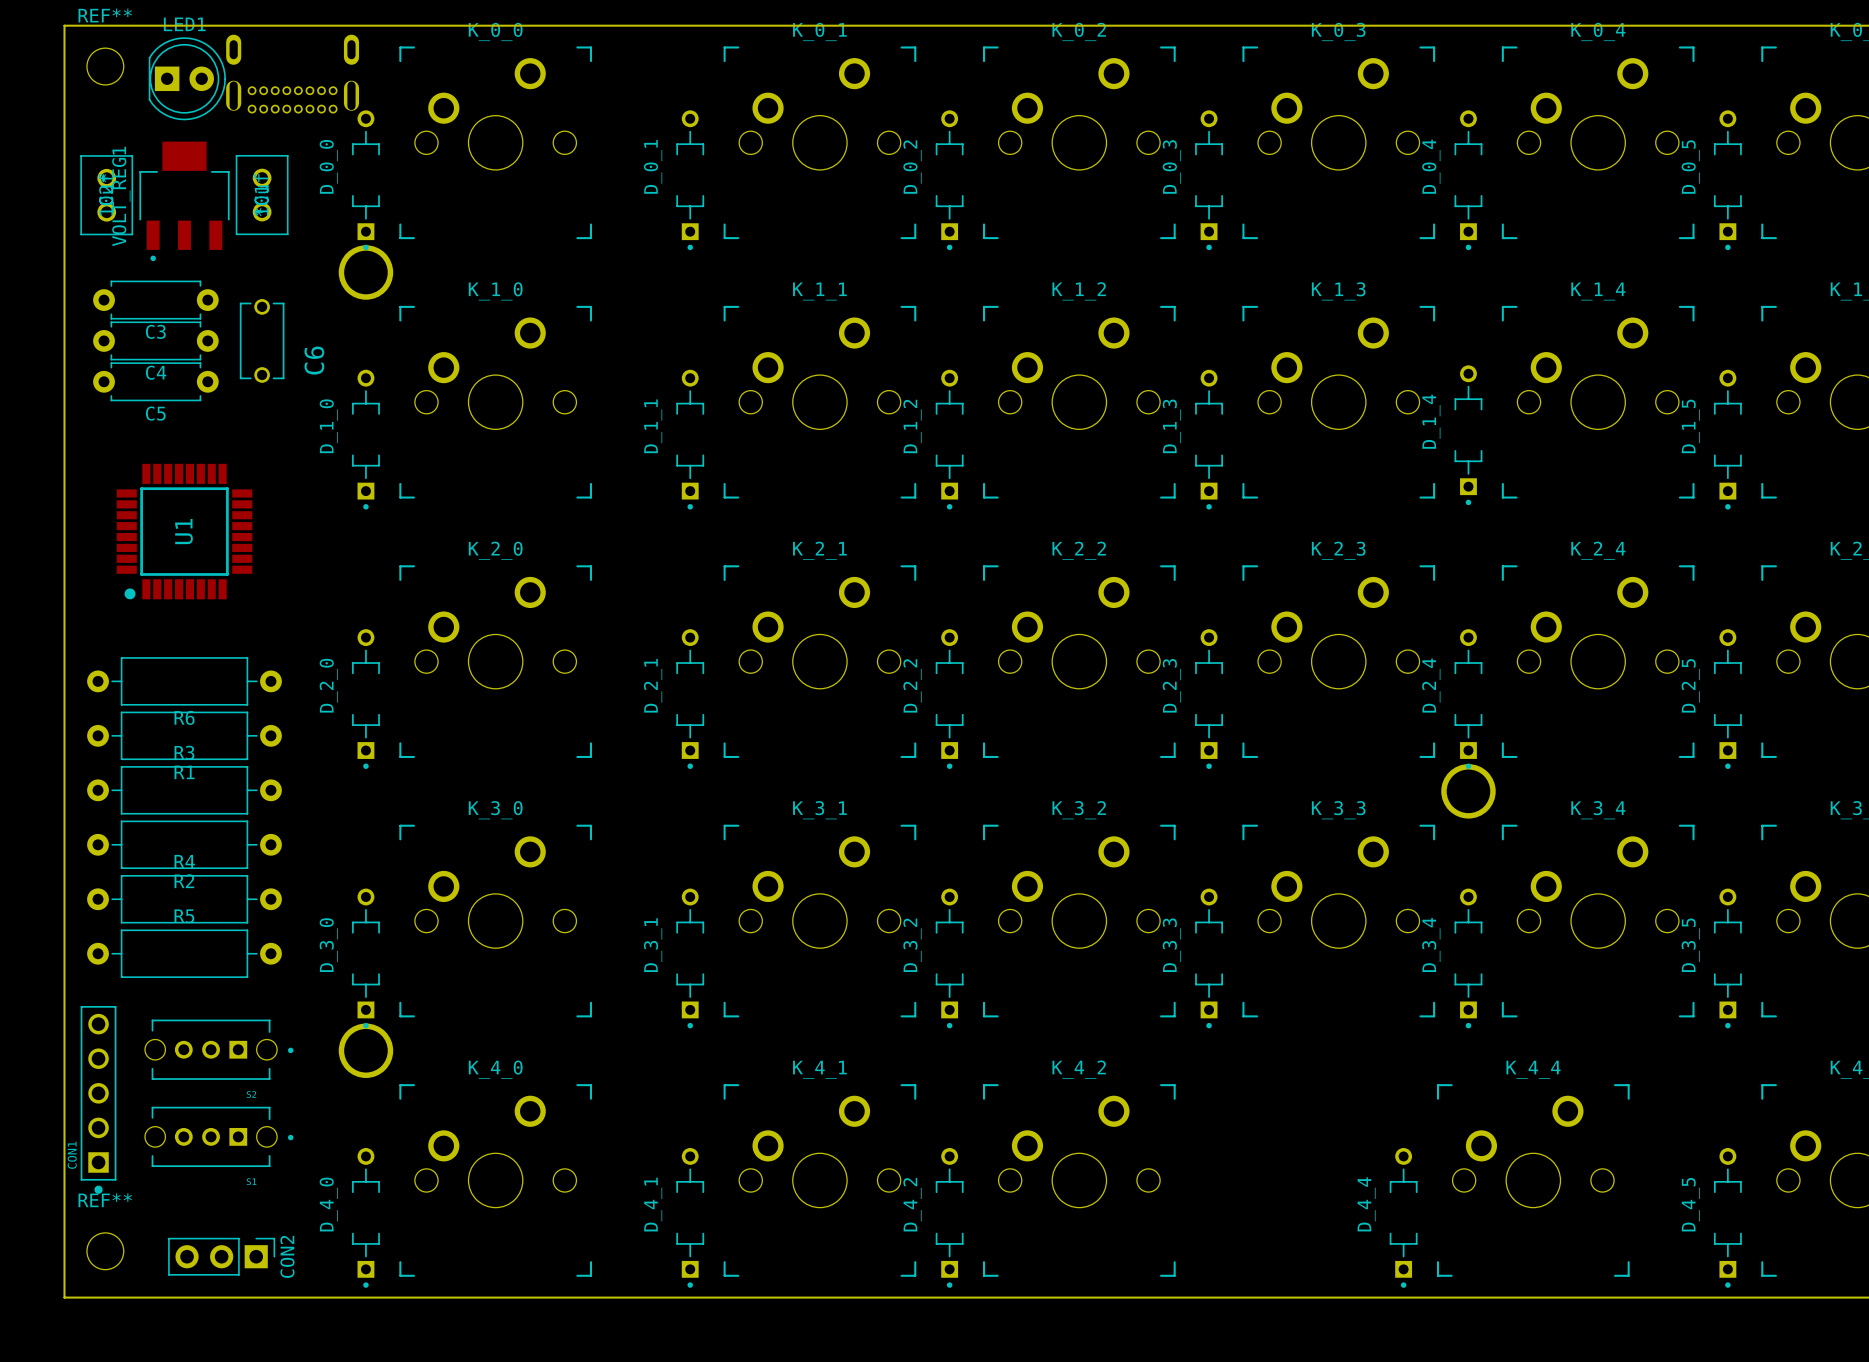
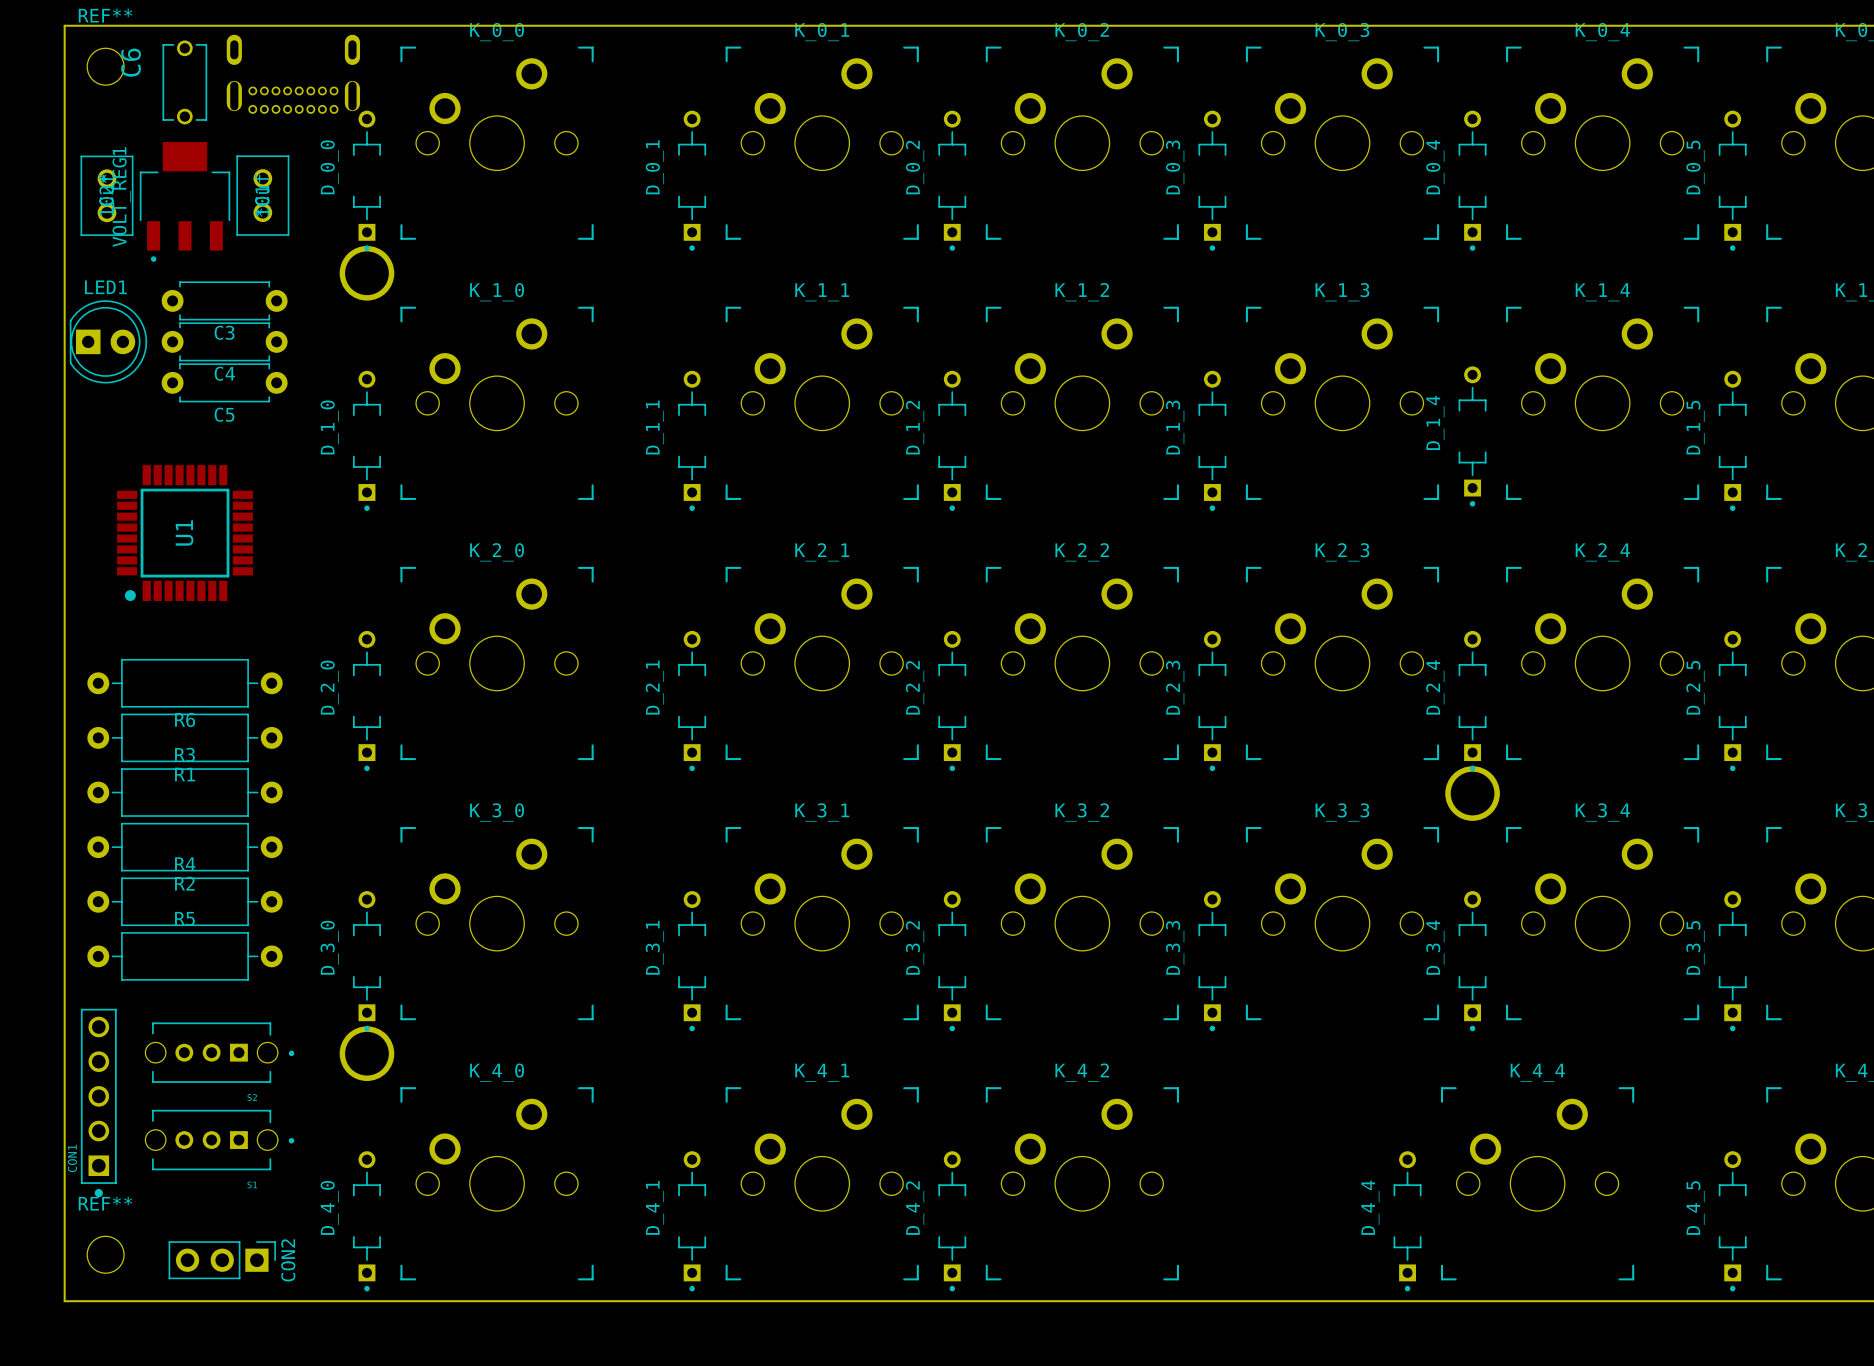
LED1 footprint: [148, 37, 226, 121] -> [69, 300, 148, 384]
C3 position: (155, 300) -> (224, 300)
C4 position: (155, 340) -> (224, 341)
C6 position: (262, 340) -> (184, 82)
C6 name position: C6 (314, 360) -> C6 (131, 62)
C5 position: (155, 381) -> (224, 382)

